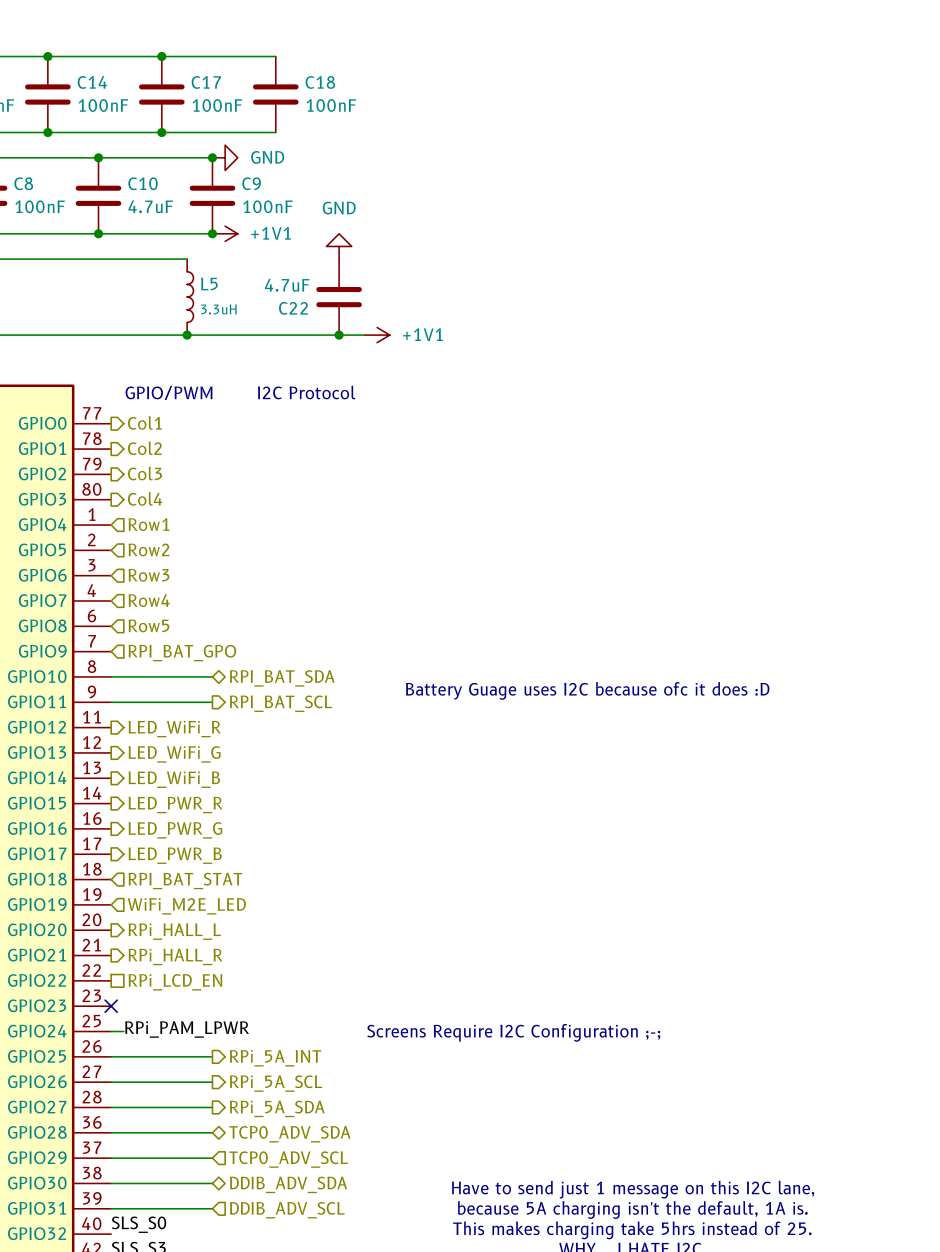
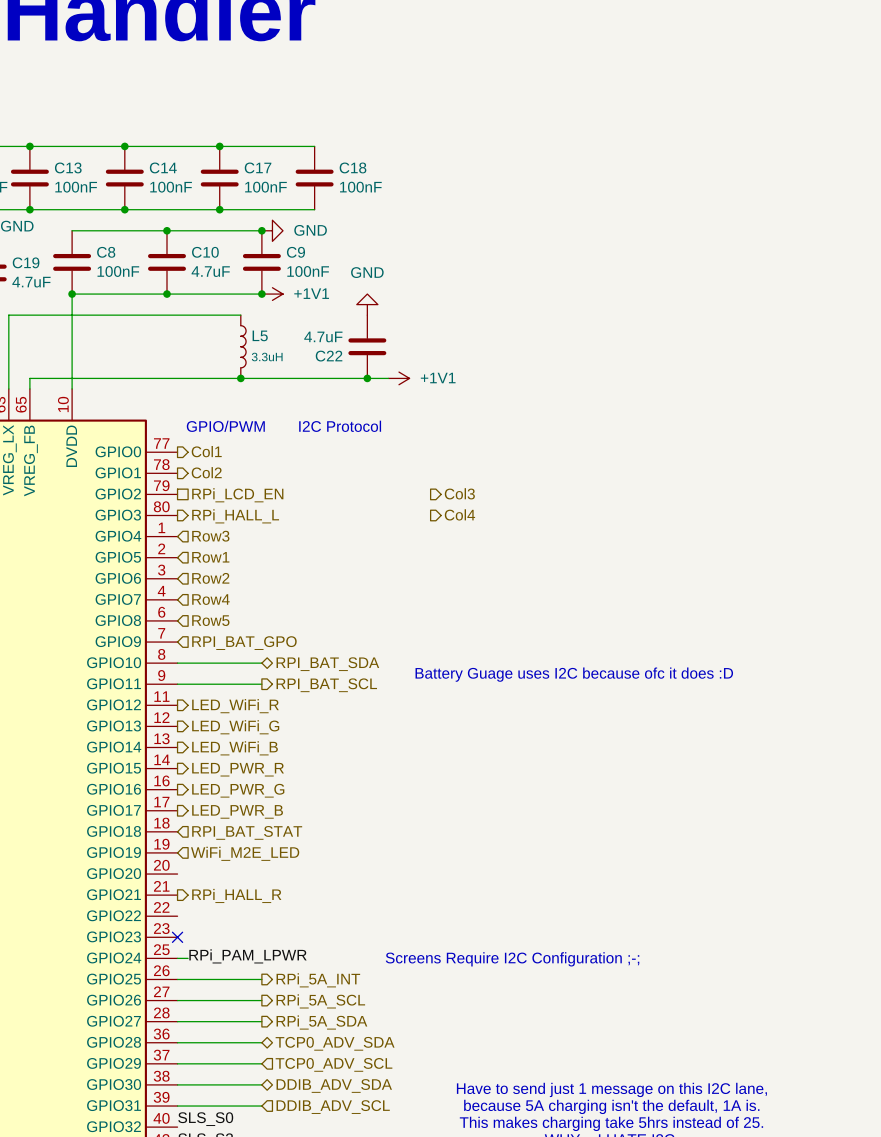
hierarchical label shape: output (144, 473) -> passive (237, 495)
hierarchical label: Col3 (144, 473) -> RPi_LCD_EN (237, 495)
hierarchical label: none -> Col3 (459, 493)
hierarchical label: Col4 (145, 498) -> RPi_HALL_L (235, 516)
hierarchical label: none -> Col4 (459, 514)
hierarchical label: Row1 (148, 524) -> Row3 (210, 536)
hierarchical label: Row2 (148, 549) -> Row1 (210, 557)
hierarchical label: Row3 (148, 575) -> Row2 (210, 578)
hierarchical label: RPi_HALL_L (174, 931) -> none
hierarchical label: RPi_LCD_EN (175, 982) -> none

